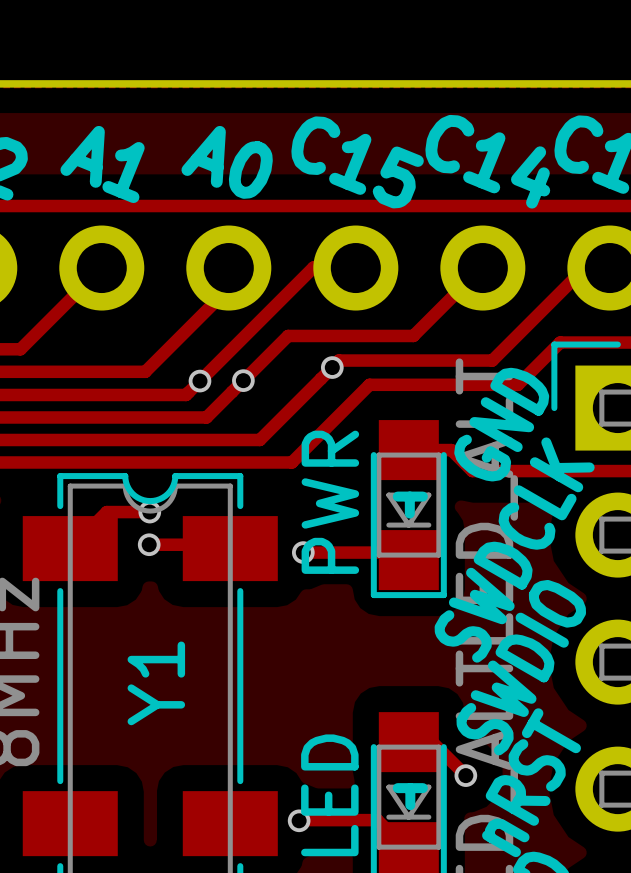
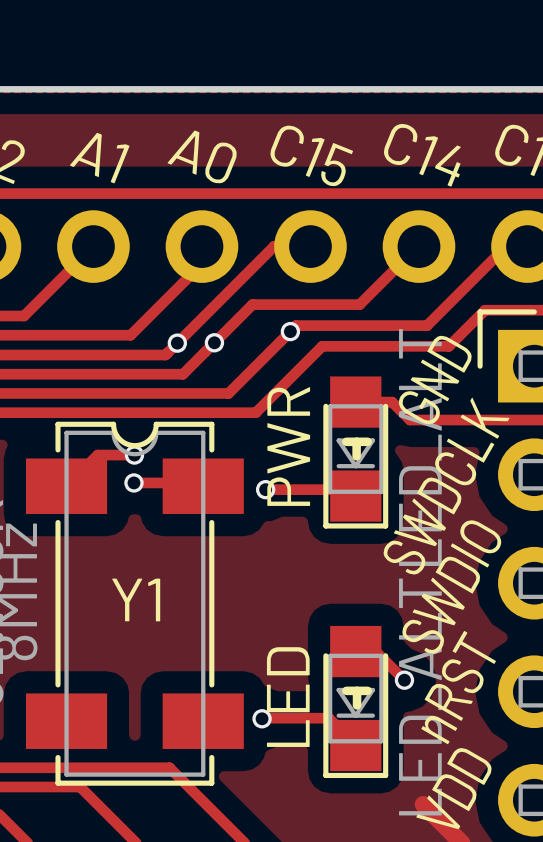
Y1 name rotation: 0° (156, 683) -> 90° clockwise (136, 599)

